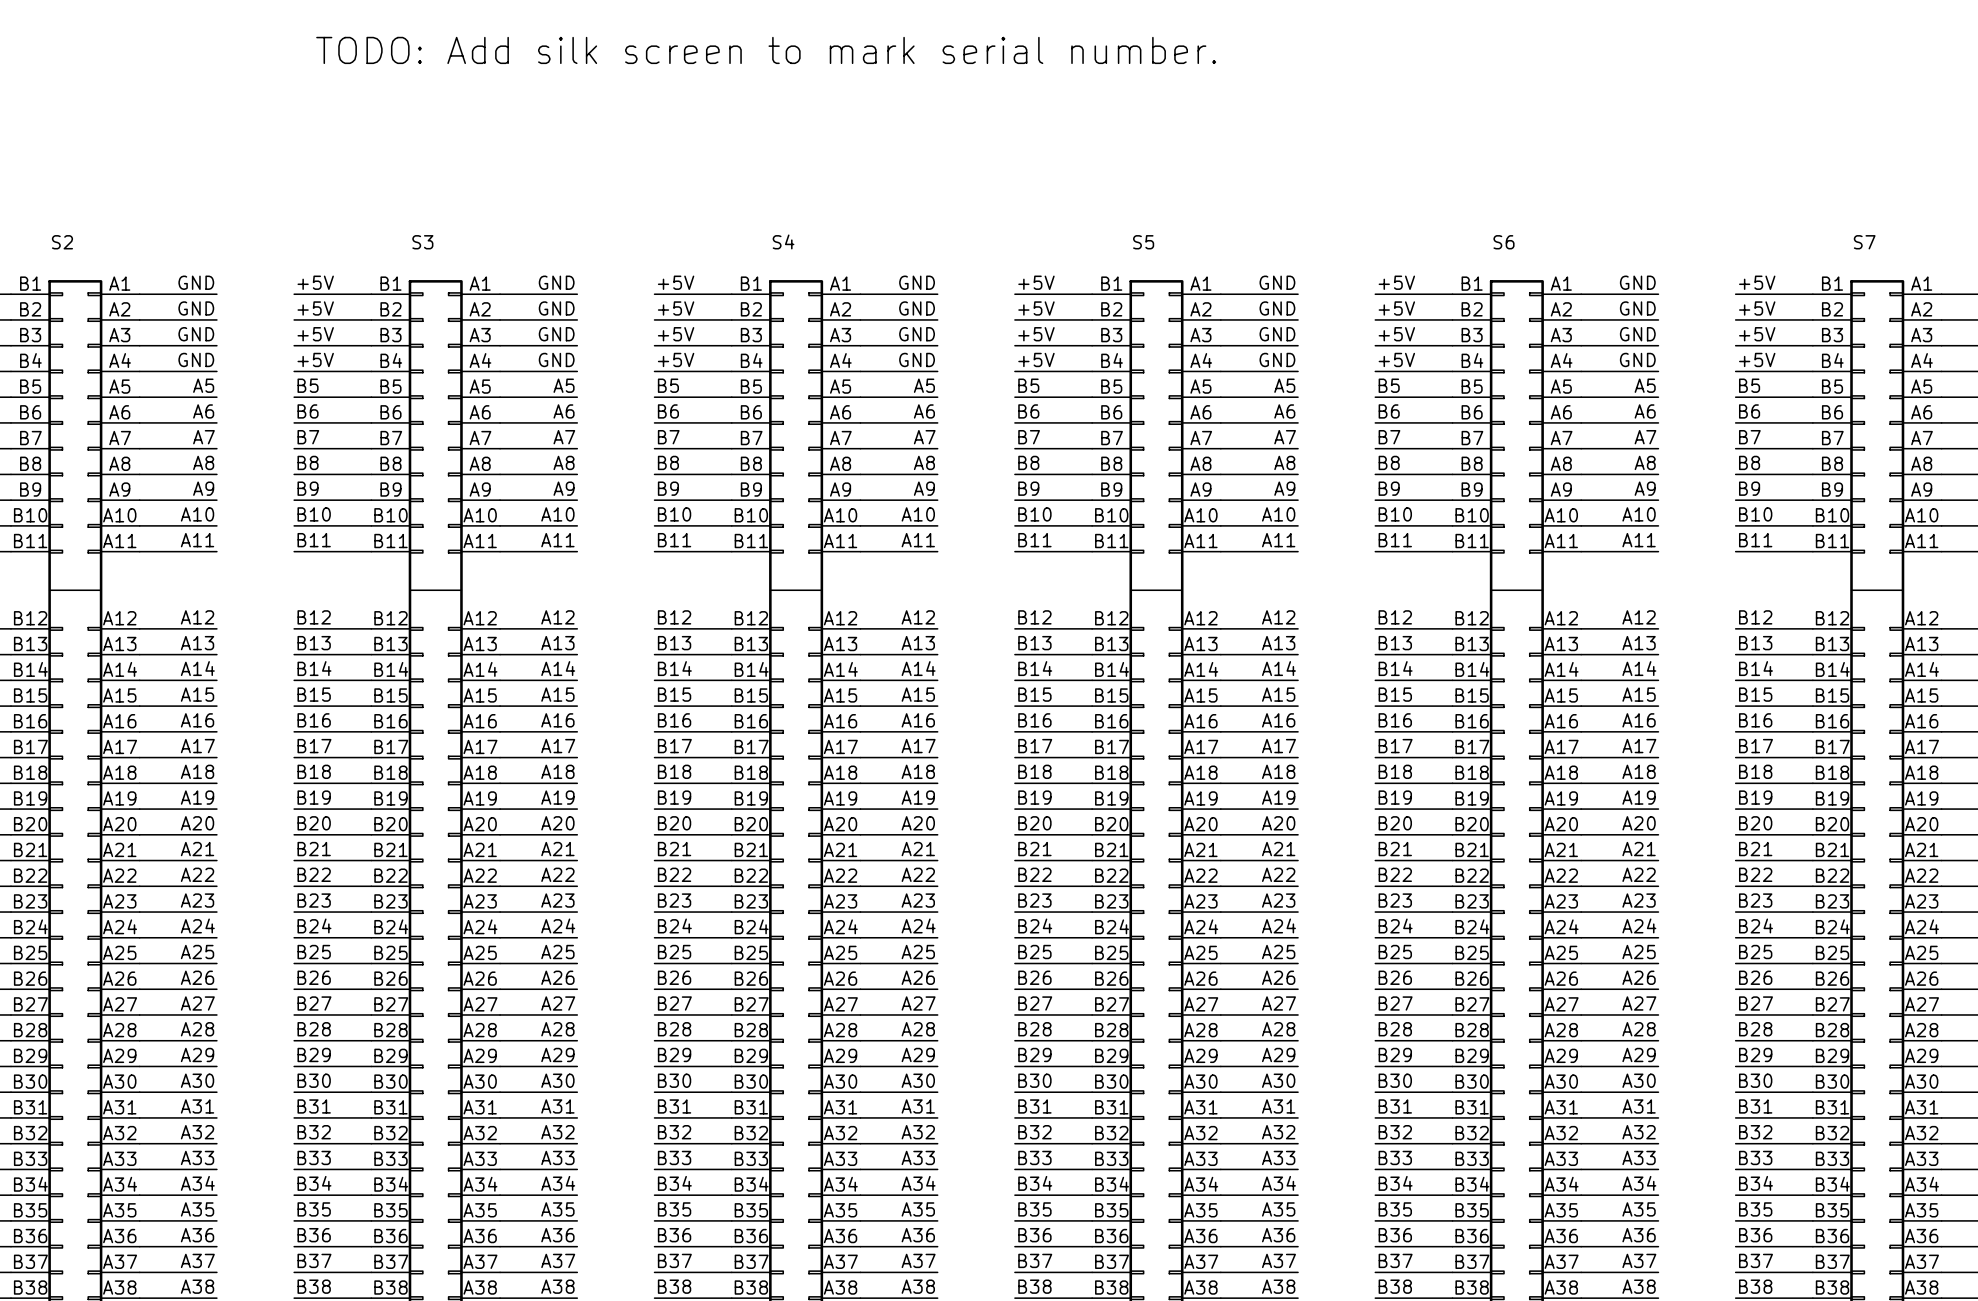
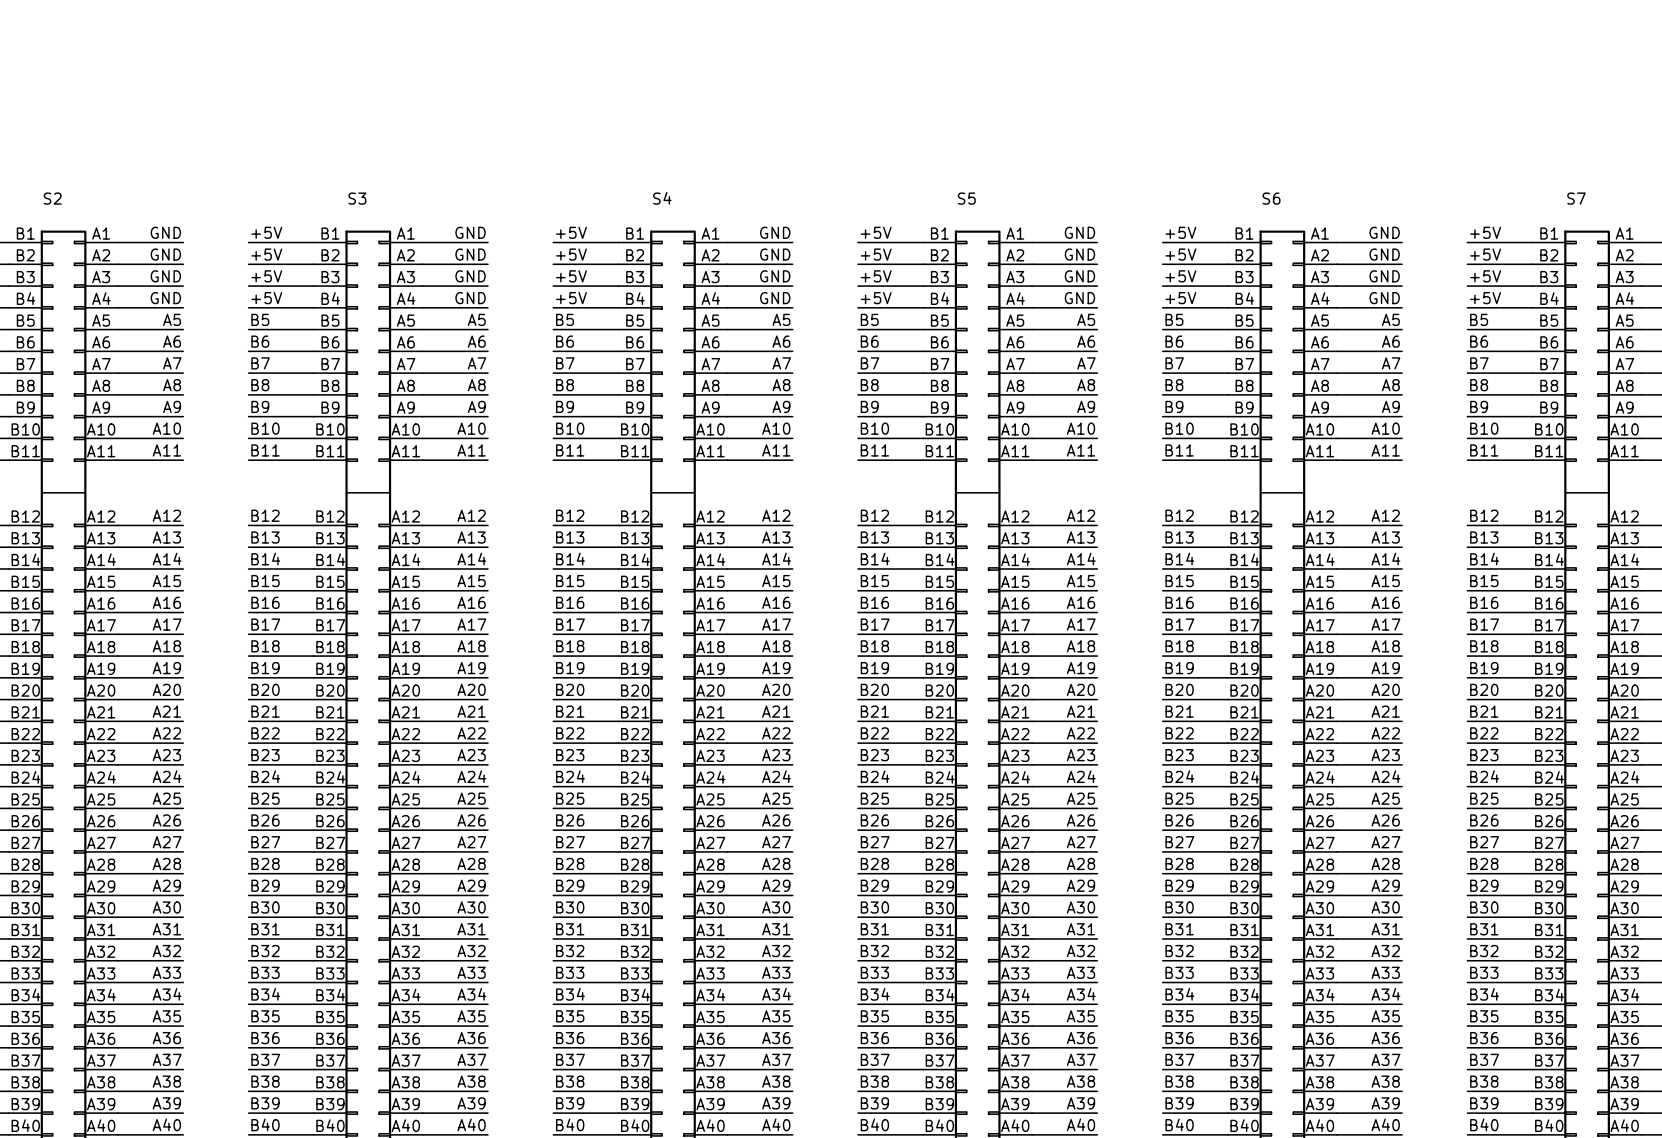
text: TODO: Add silk screen to mark serial number. (766, 50) -> none

